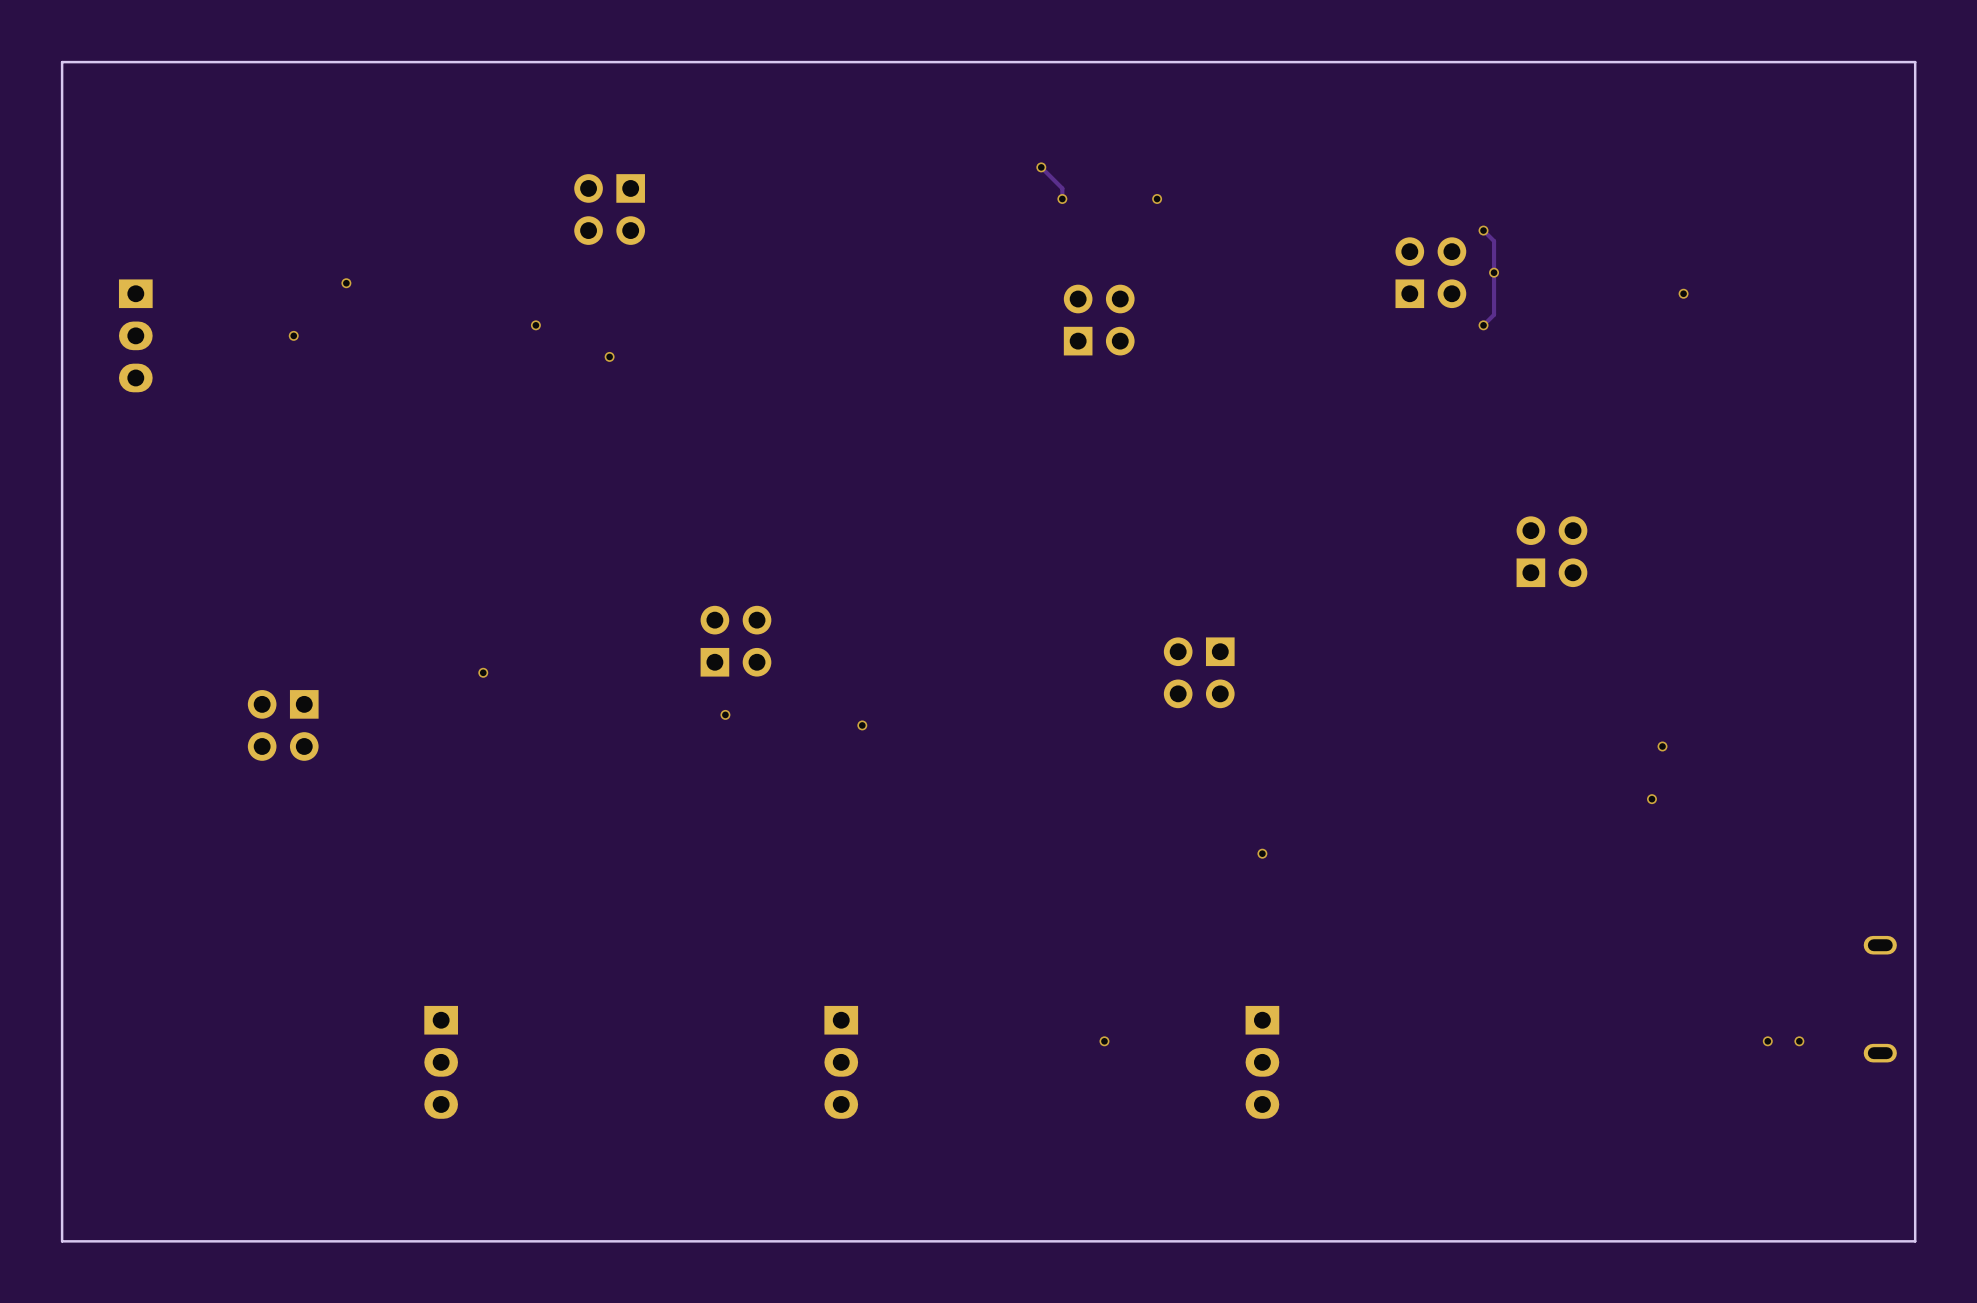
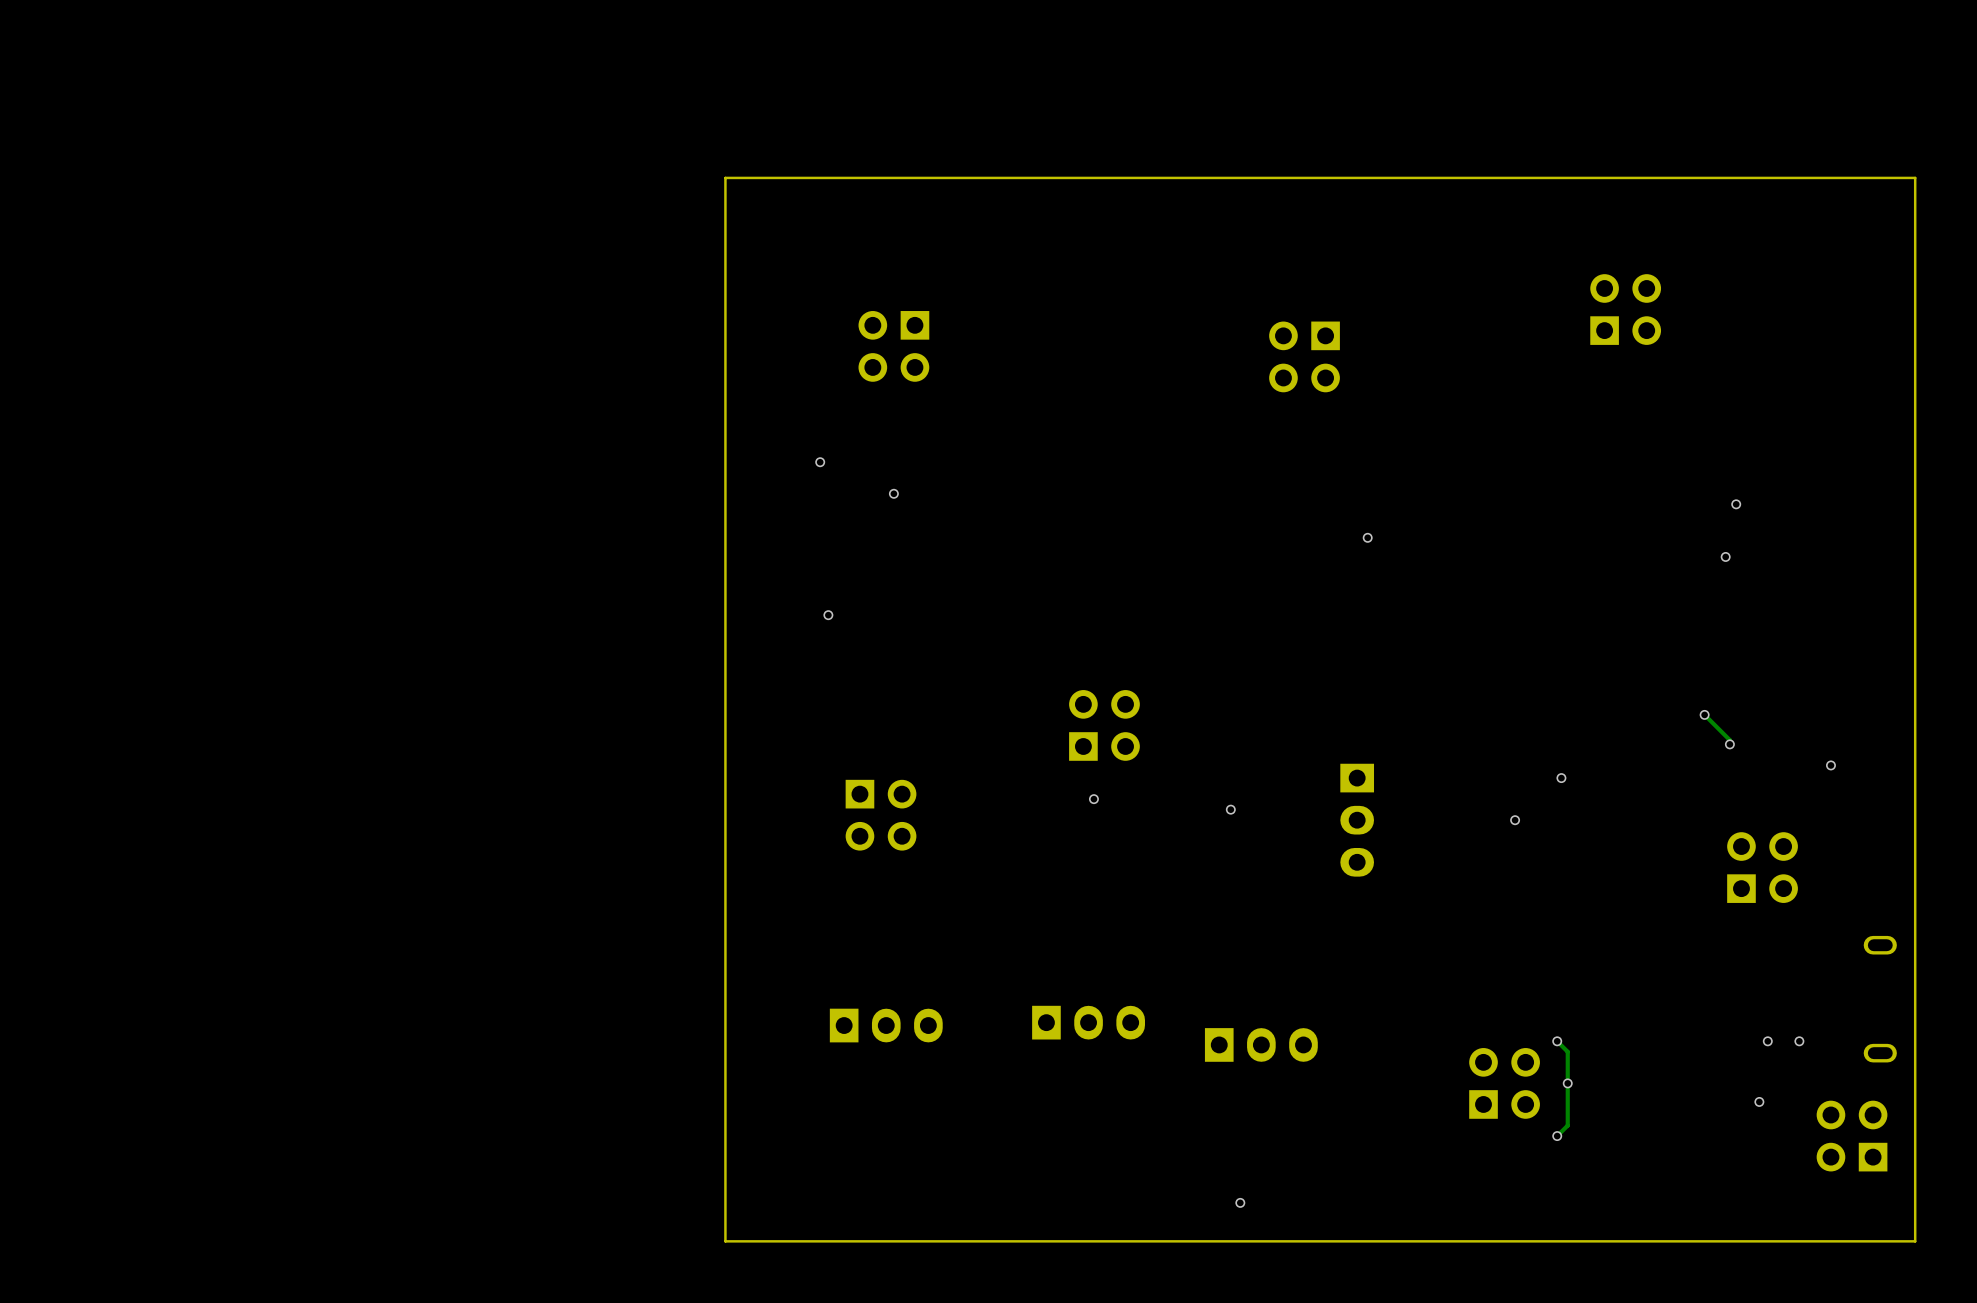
track: (1041, 167) (1062, 188) (1062, 198) -> none
via: (1041, 167) -> none
board edge: (1915, 177) (1915, 62) (62, 62) (62, 1241) (725, 1241) -> (1915, 177) (725, 177) (725, 1241)
via: (1062, 198) -> none
via: (1157, 198) -> none
part: (609, 209) -> none
track: (1483, 230) (1494, 241) (1494, 314) (1483, 325) -> none
via: (1483, 230) -> none
part: (1430, 272) -> none
via: (1494, 272) -> none
via: (346, 283) -> none
via: (1683, 293) -> none
part: none -> (1625, 309)
part: (1099, 320) -> none
via: (535, 325) -> none
via: (1483, 325) -> none
part: (135, 335) -> none
via: (293, 335) -> none
part: none -> (893, 346)
via: (609, 356) -> none
part: none -> (1304, 356)
via: none -> (820, 462)
via: none -> (893, 493)
via: none -> (1736, 504)
via: none -> (1367, 537)
part: (1551, 551) -> none
via: none -> (1725, 556)
via: none -> (828, 615)
part: (735, 641) -> none
via: (483, 672) -> none
part rotation: 0° (1199, 672) -> 180° (1104, 725)
part position: (1199, 672) -> (1104, 725)
via: (725, 714) -> none
track: none -> (1704, 714) (1729, 740) (1729, 744)
via: none -> (1704, 714)
part: (283, 725) -> none
via: (862, 725) -> none
via: none -> (1729, 744)
via: (1662, 746) -> none
via: none -> (1830, 765)
via: none -> (1561, 778)
via: none -> (1093, 799)
via: (1651, 799) -> none
part: none -> (881, 815)
part: none -> (1357, 820)
via: none -> (1515, 820)
via position: (1262, 853) -> (1230, 809)
part: none -> (1762, 867)
part: none -> (1088, 1022)
via: (1104, 1041) -> none
track: none -> (1557, 1041) (1567, 1051) (1567, 1125) (1557, 1136)
via: none -> (1557, 1041)
part: (441, 1062) -> none
part rotation: 0° (841, 1062) -> 90° counterclockwise (886, 1025)
part rotation: 0° (1262, 1062) -> 90° counterclockwise (1261, 1044)
part: none -> (1504, 1083)
via: none -> (1567, 1083)
via: none -> (1759, 1101)
via: none -> (1557, 1136)
part: none -> (1852, 1136)
via: none -> (1240, 1202)

